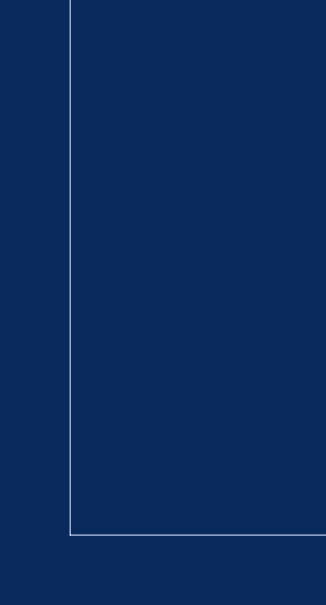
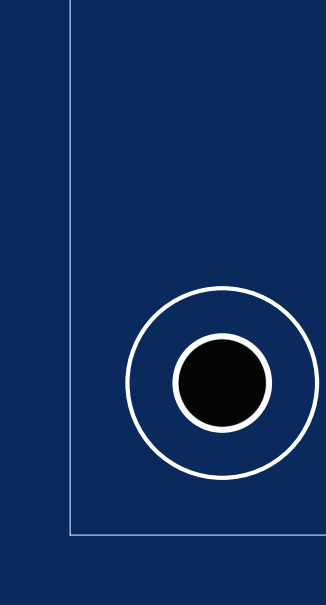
part: none -> (222, 383)

